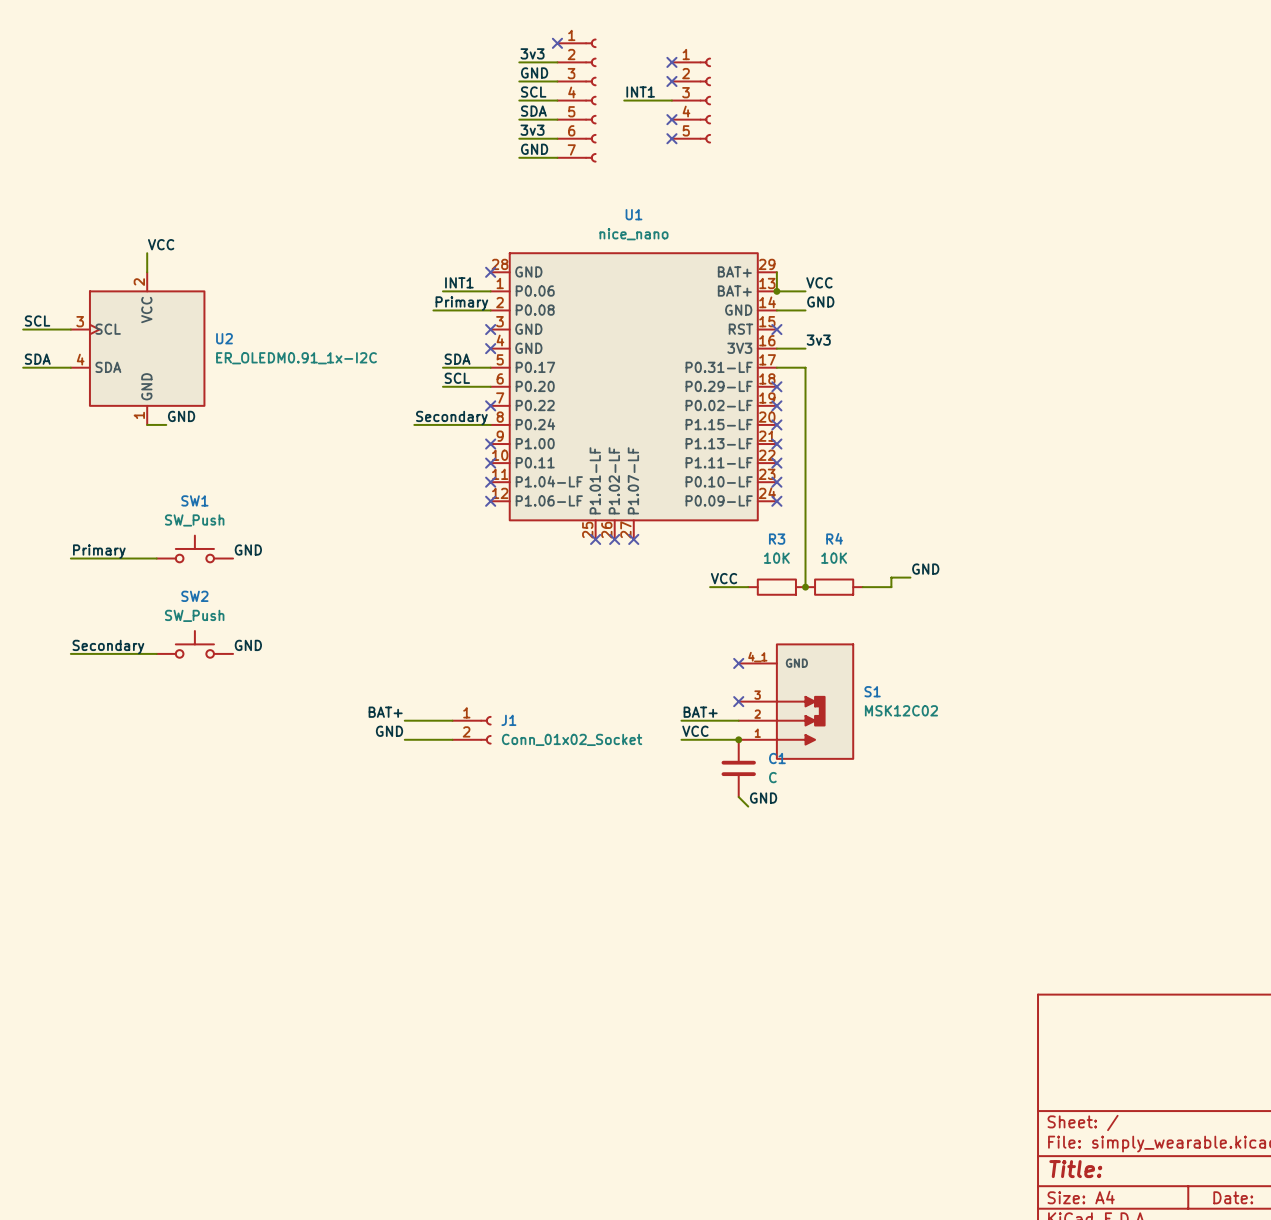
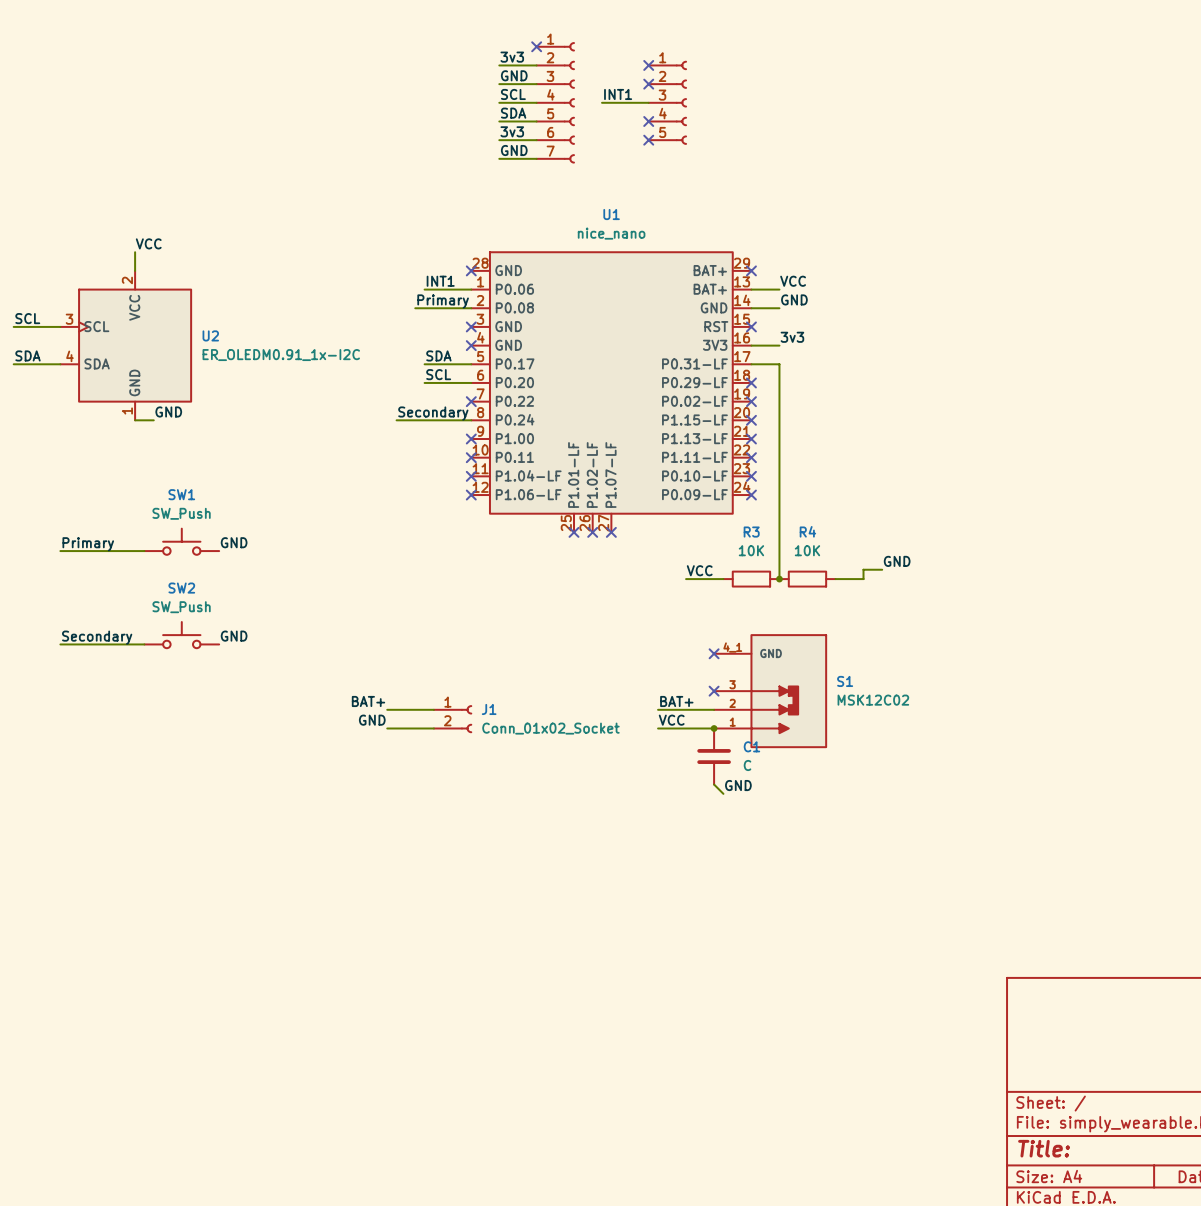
wire: (776, 272) (776, 291) -> none
no-connect mark: none -> (751, 270)
junction: (776, 291) -> none

